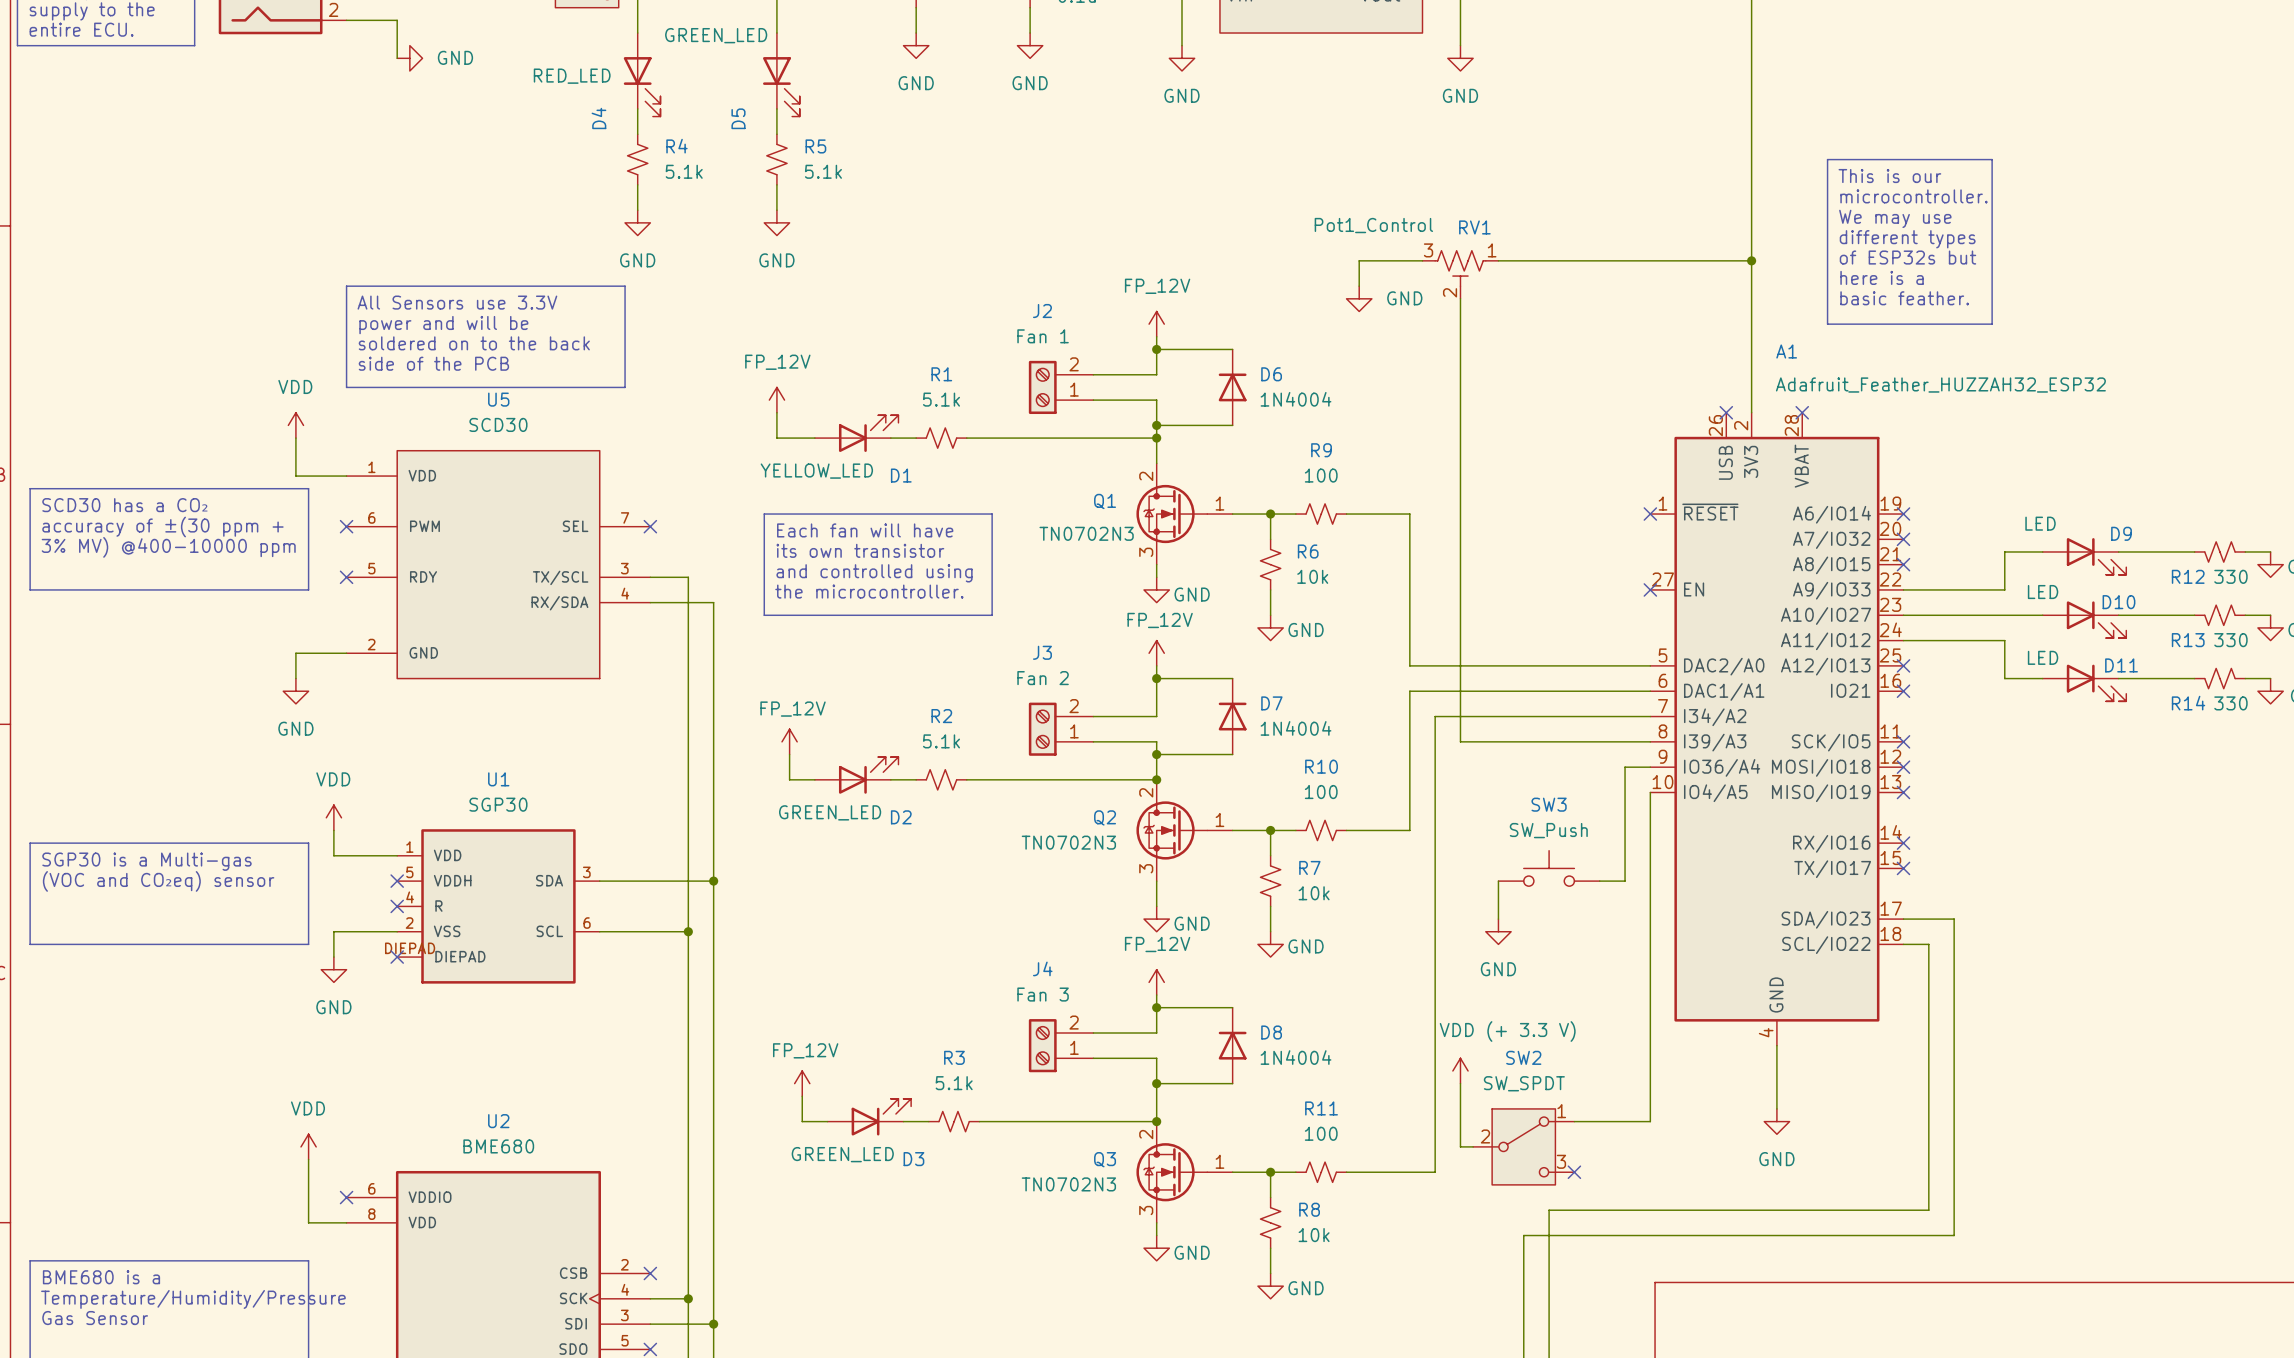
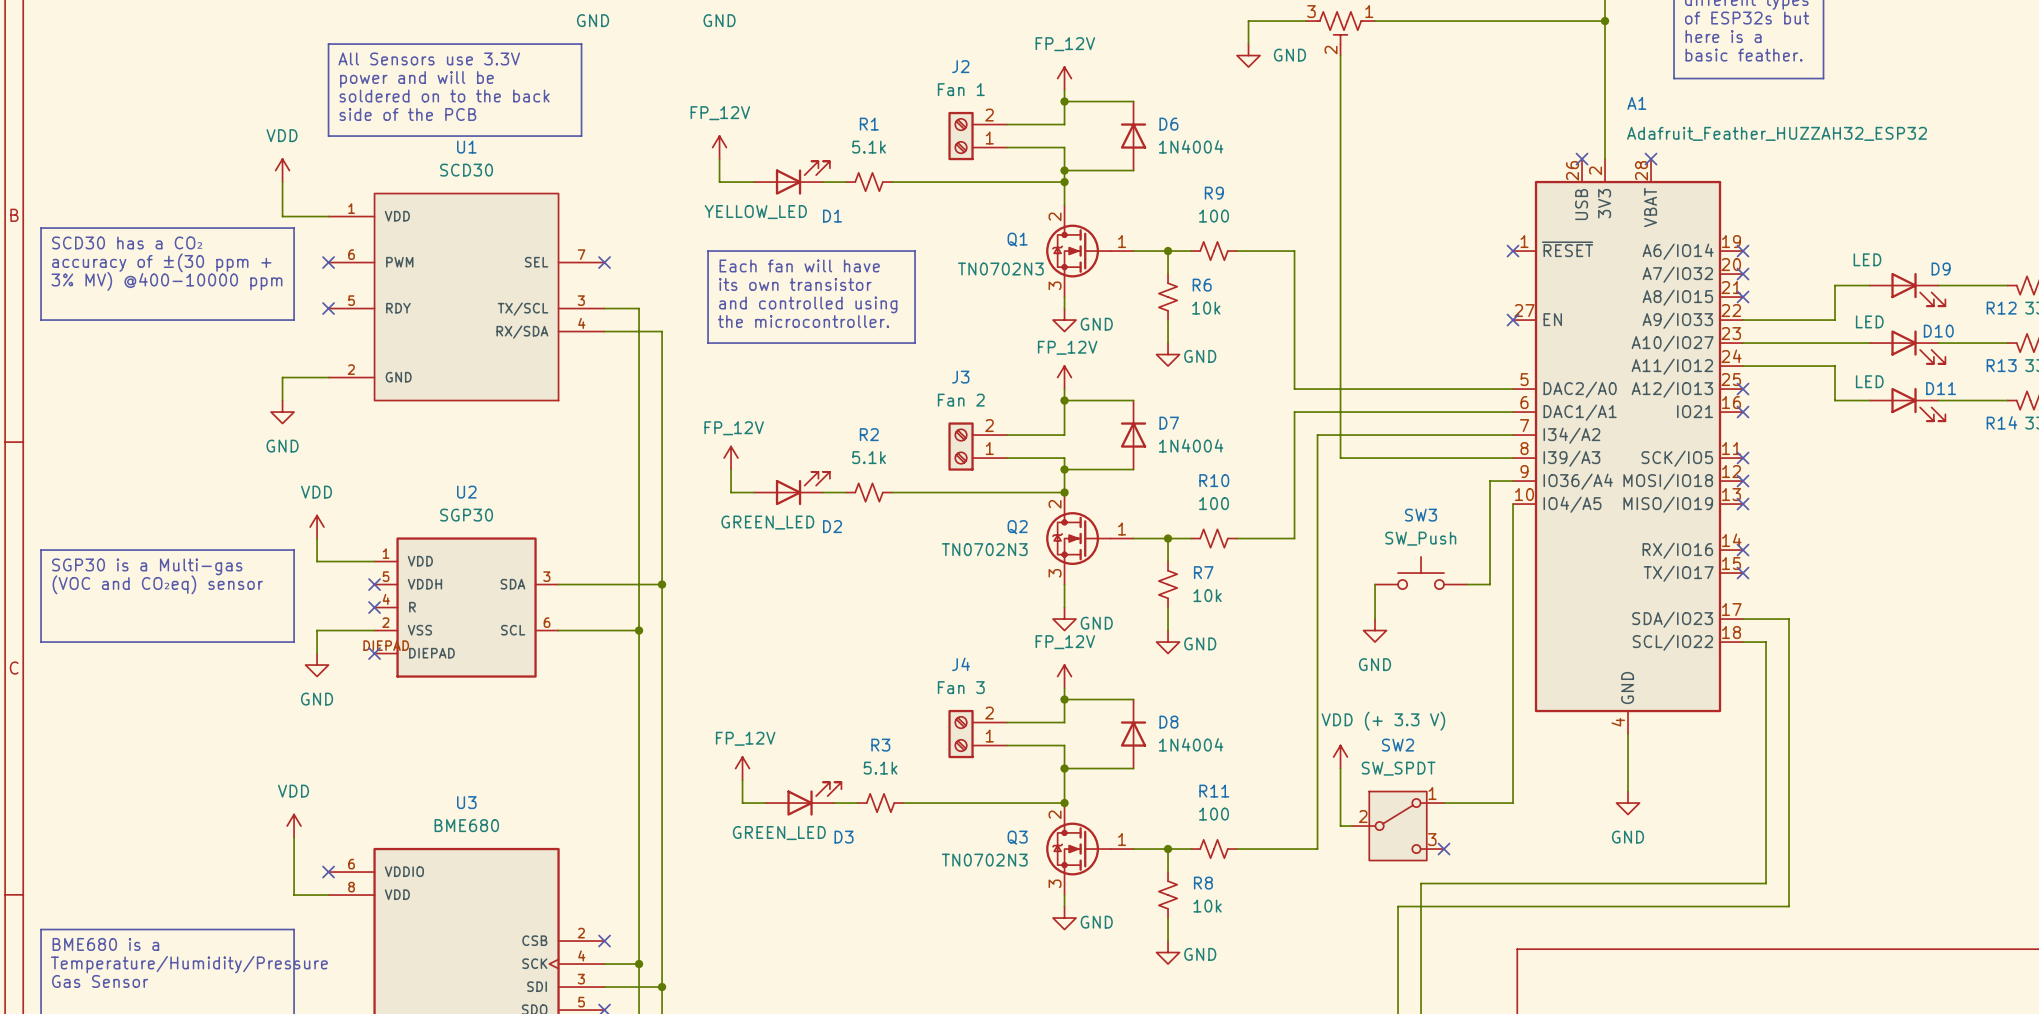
U5 name: U5 (498, 399) -> U1 (466, 147)
U1 name: U1 (498, 779) -> U2 (466, 492)
U2 name: U2 (498, 1121) -> U3 (466, 802)

